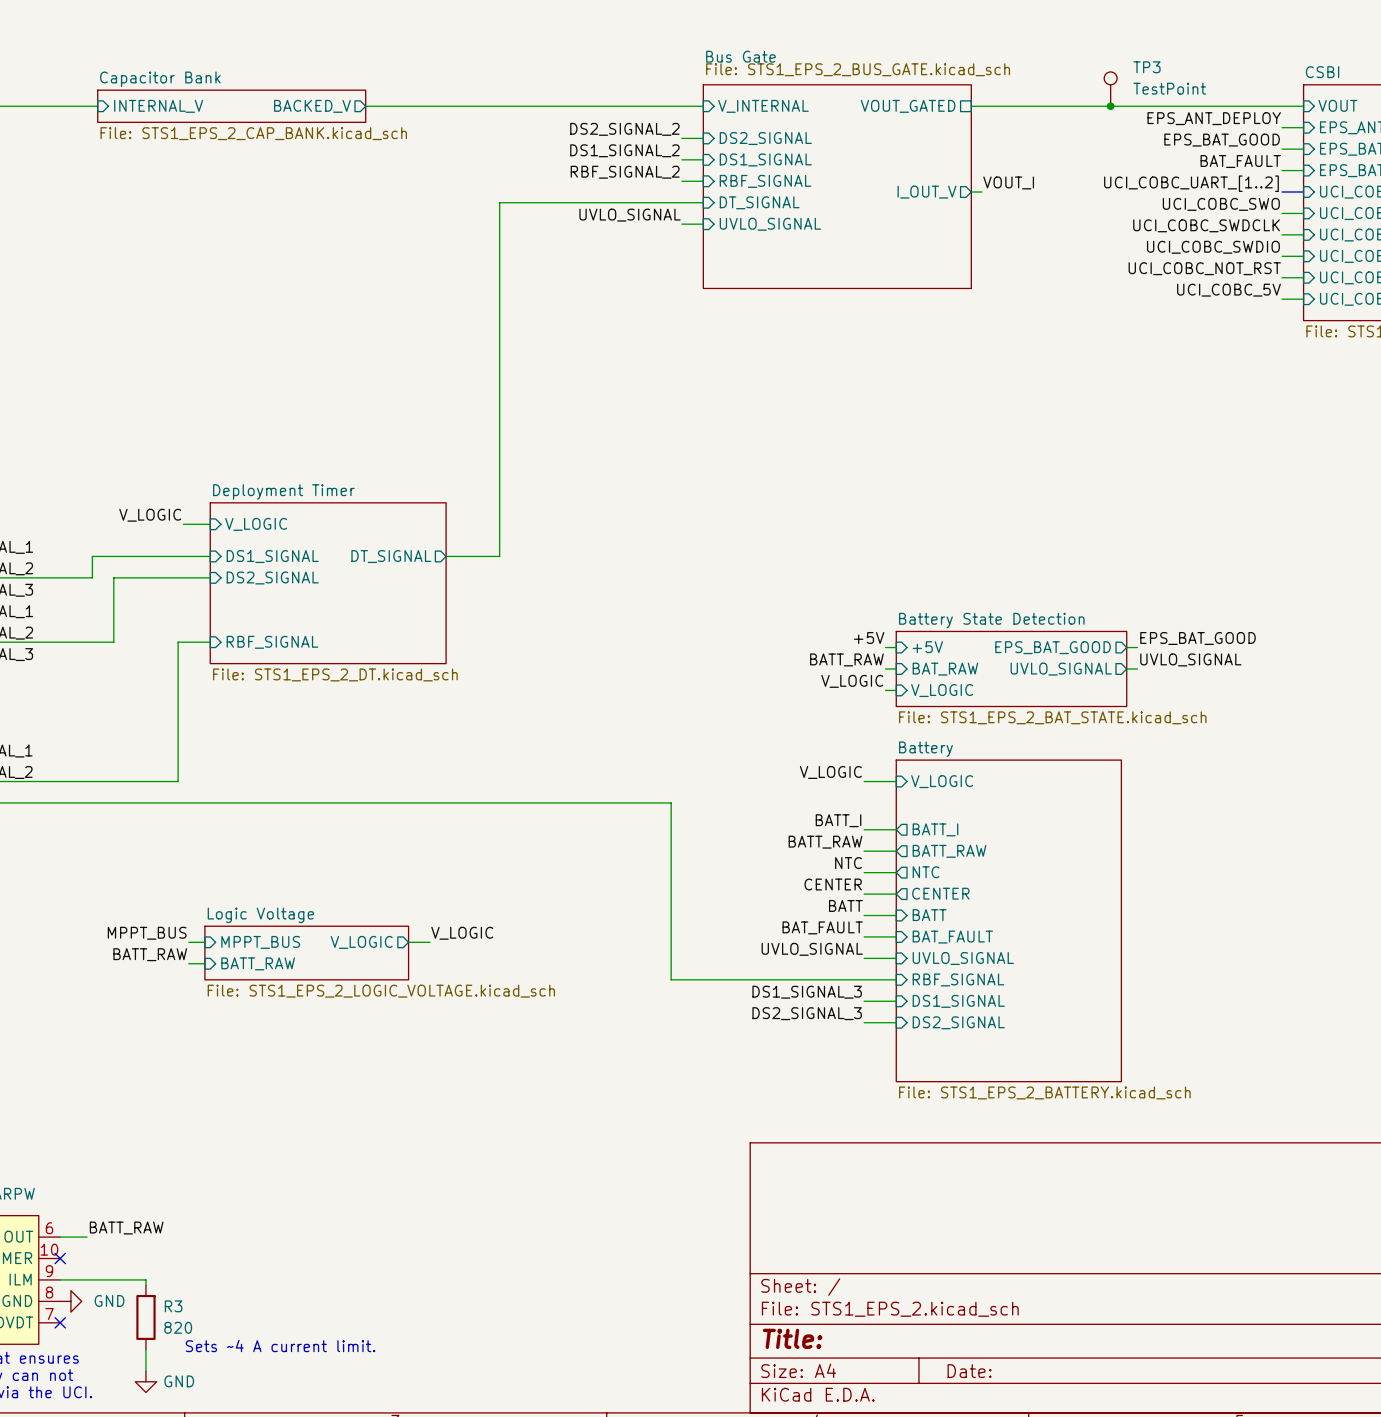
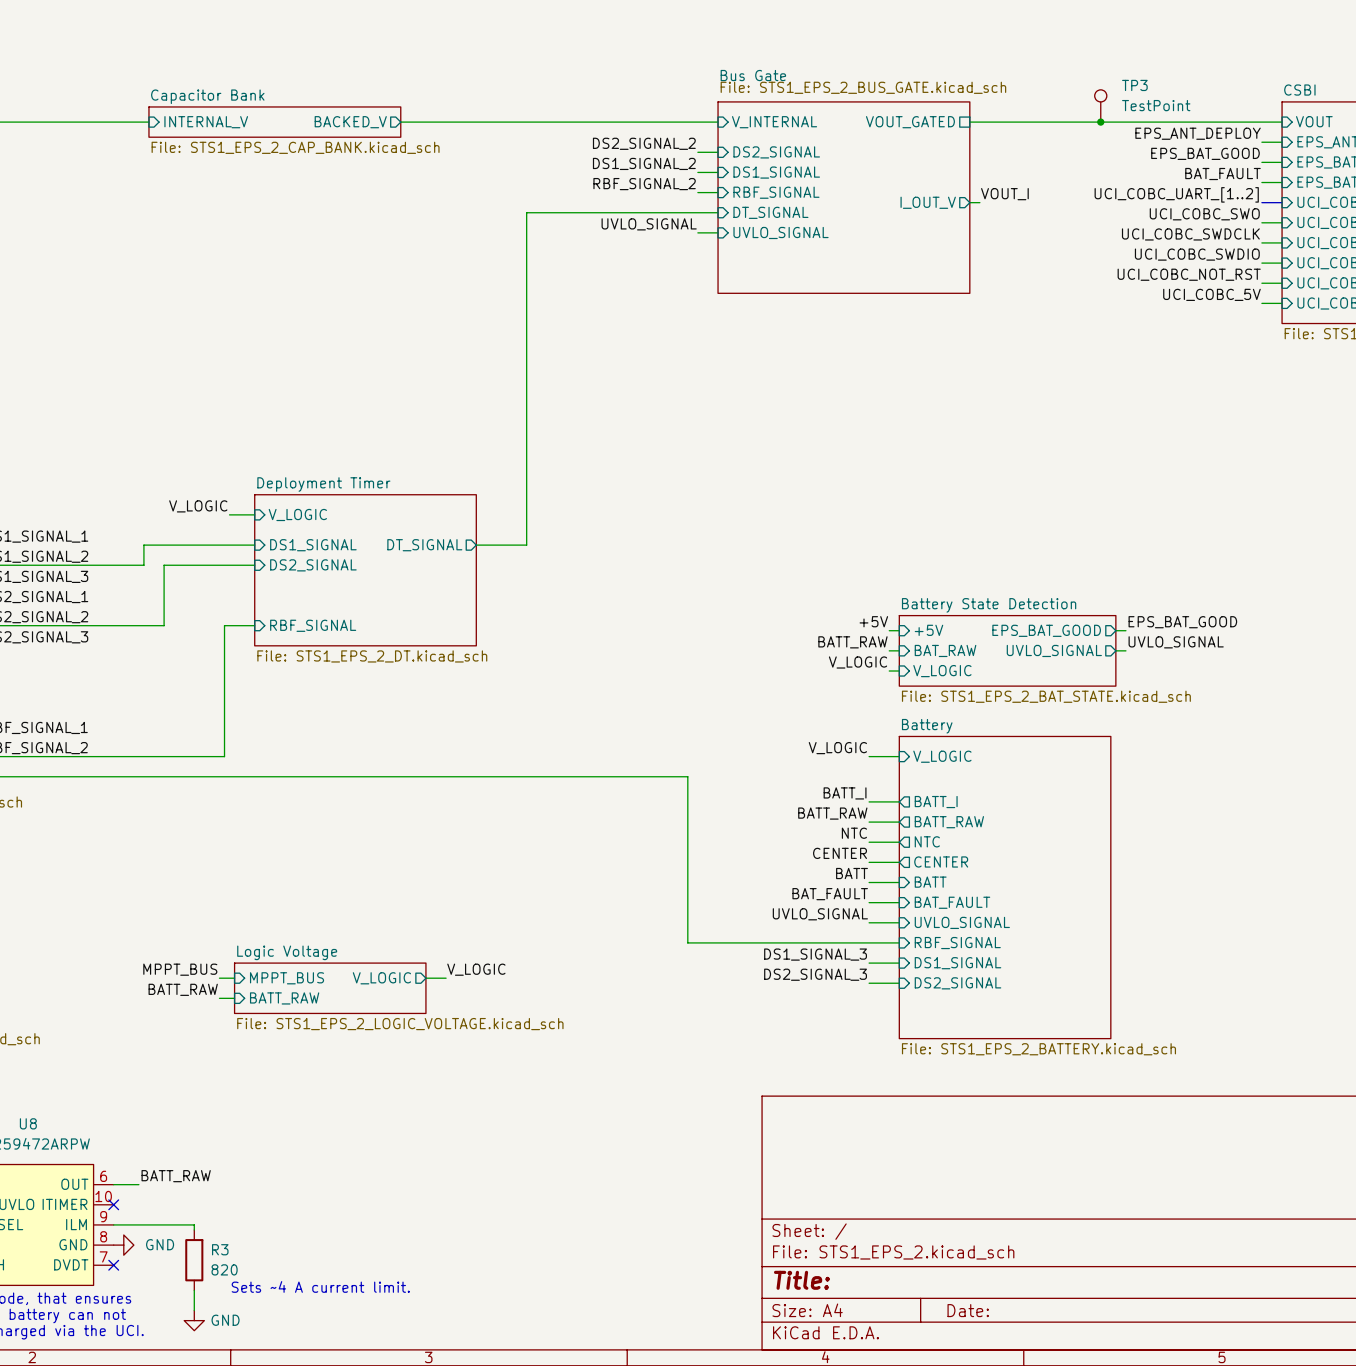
label position: MPPT_BUS (147, 933) -> MPPT_BUS (180, 969)
label position: V_LOGIC (462, 933) -> V_LOGIC (476, 969)
wire: (188, 942) (204, 942) -> (219, 998) (234, 998)
sheet pin position: MPPT_BUS (260, 942) -> MPPT_BUS (287, 978)
sheet pin position: V_LOGIC (361, 942) -> V_LOGIC (381, 978)
wire: (408, 942) (430, 942) -> (425, 978) (446, 978)
sheet Logic Voltage position: (306, 953) -> (330, 988)
label position: BATT_RAW (150, 954) -> BATT_RAW (183, 989)
wire: (188, 963) (204, 963) -> (219, 978) (234, 978)
sheet pin position: BATT_RAW (258, 963) -> BATT_RAW (284, 998)

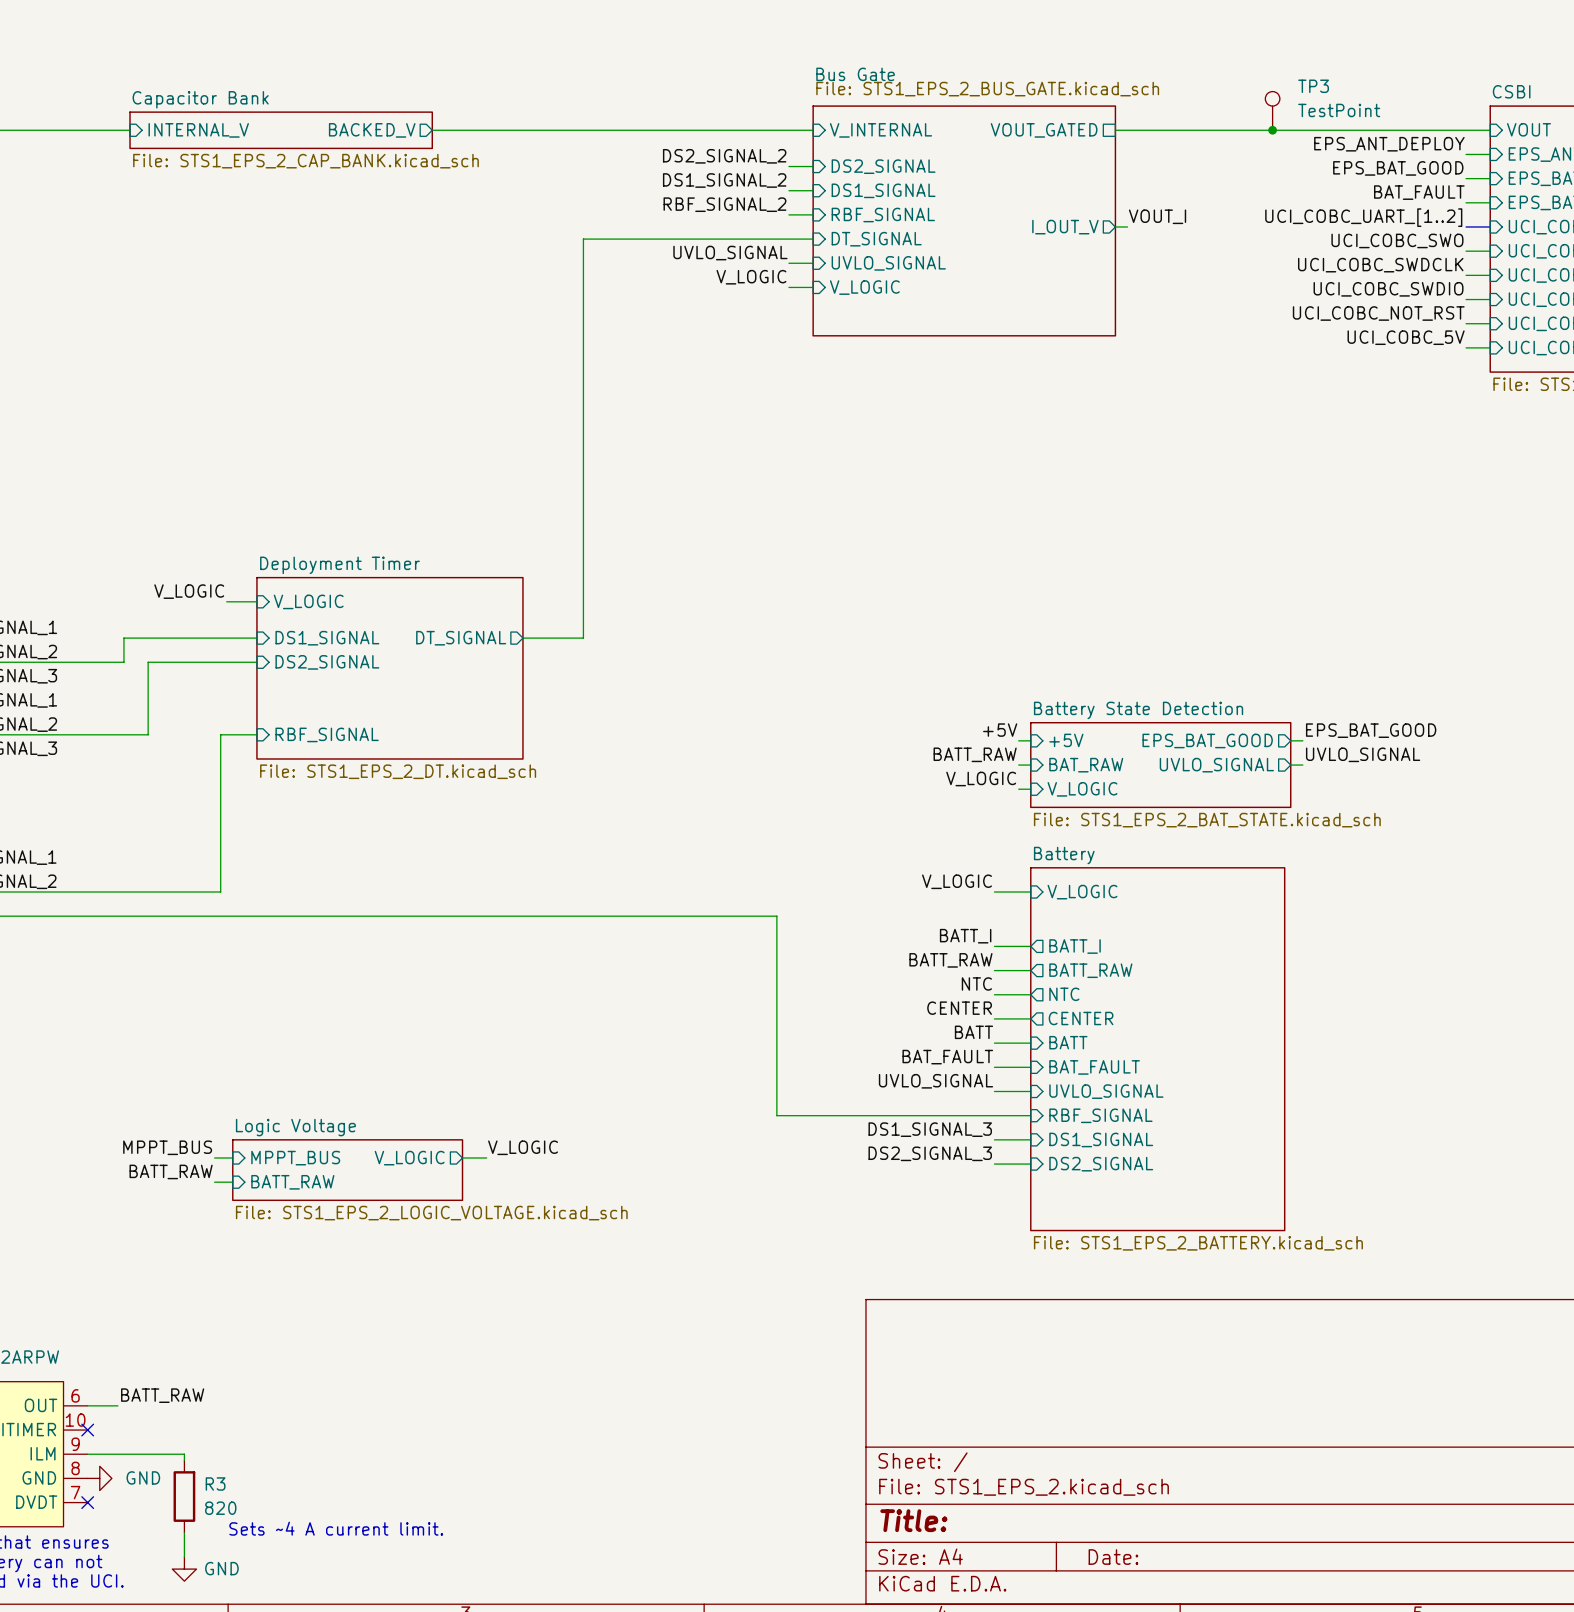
label: none -> V_LOGIC (751, 277)
wire: none -> (788, 287) (813, 287)
sheet pin: none -> V_LOGIC (864, 287)

